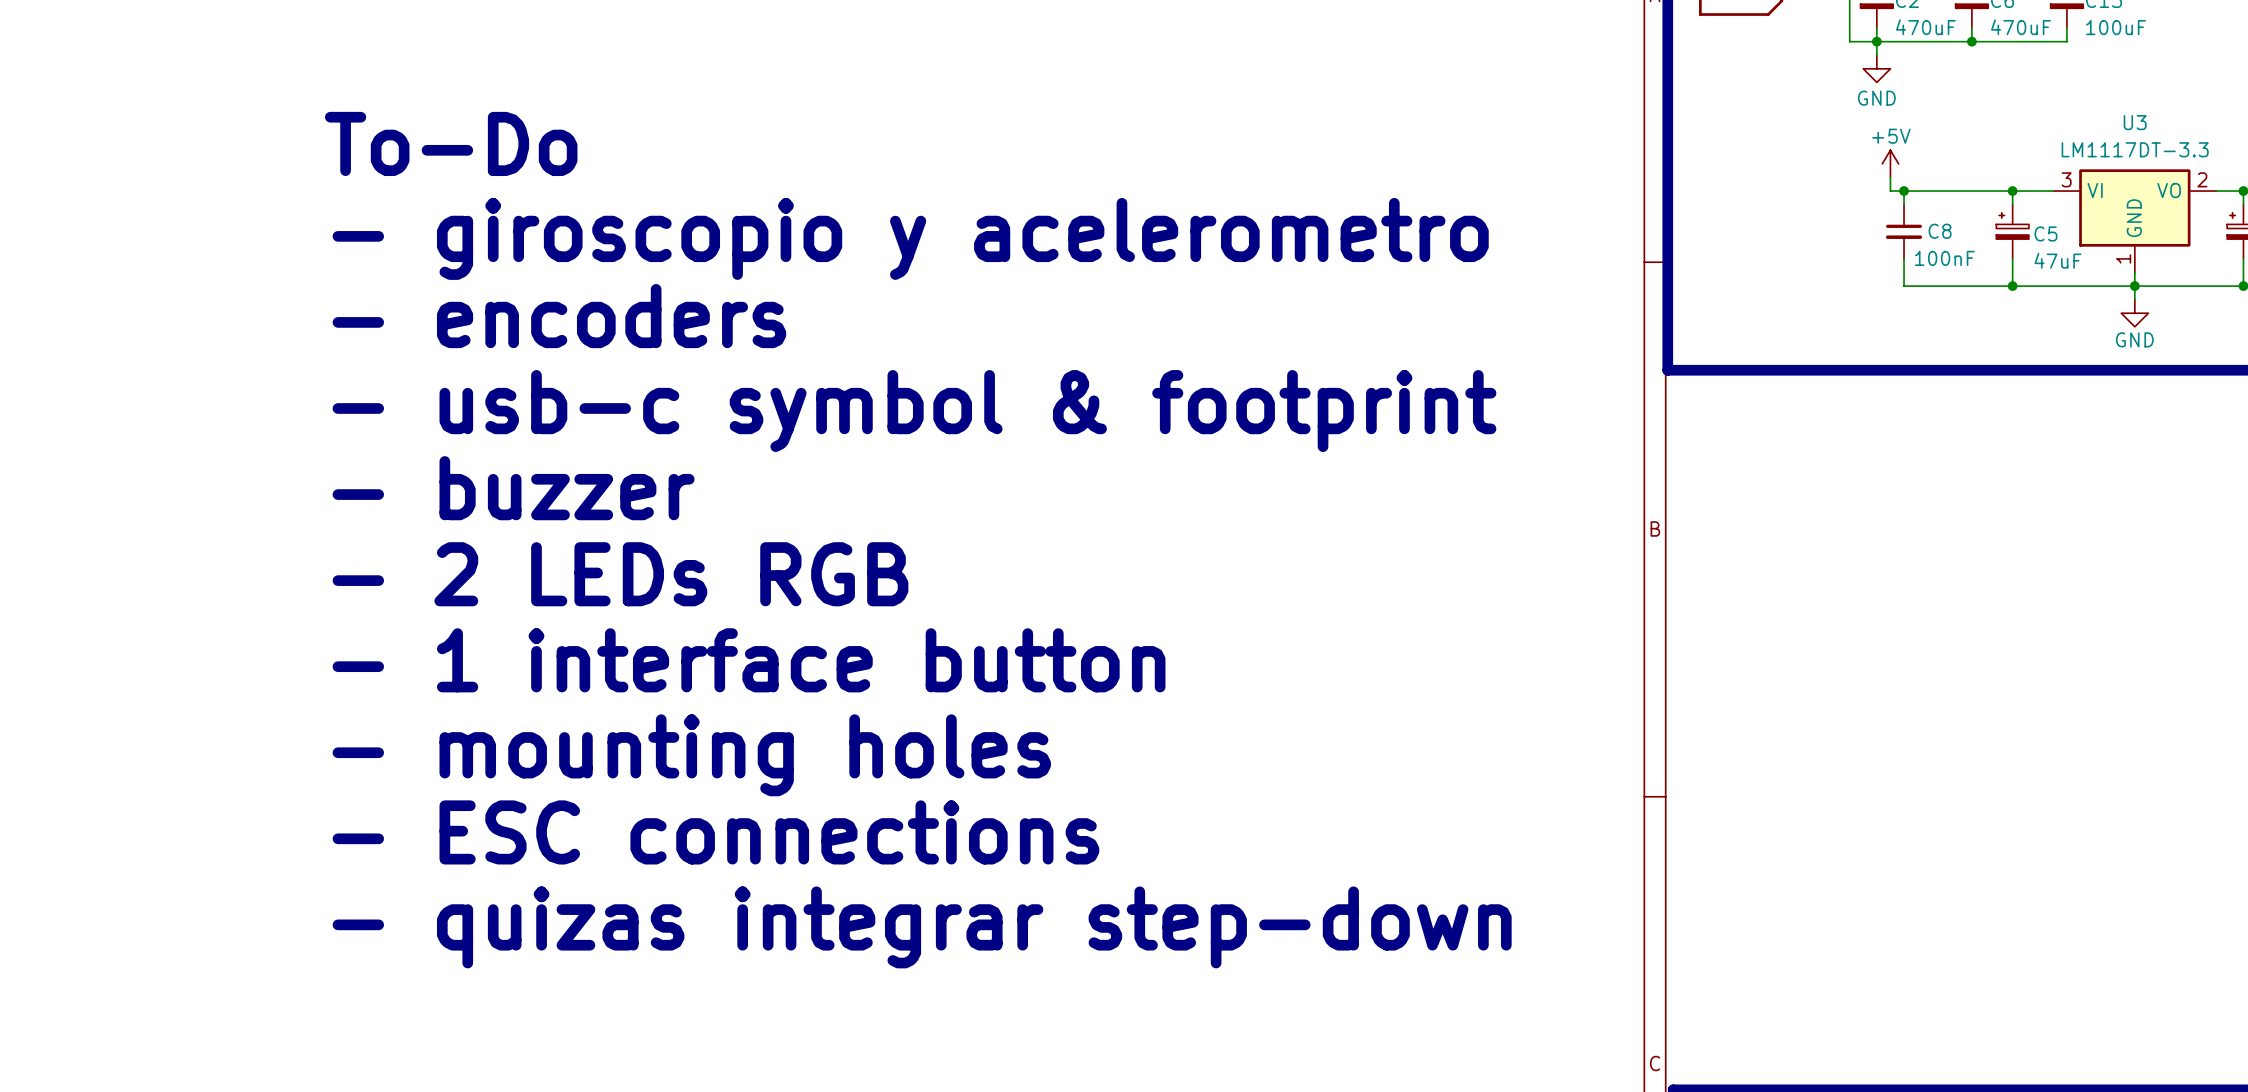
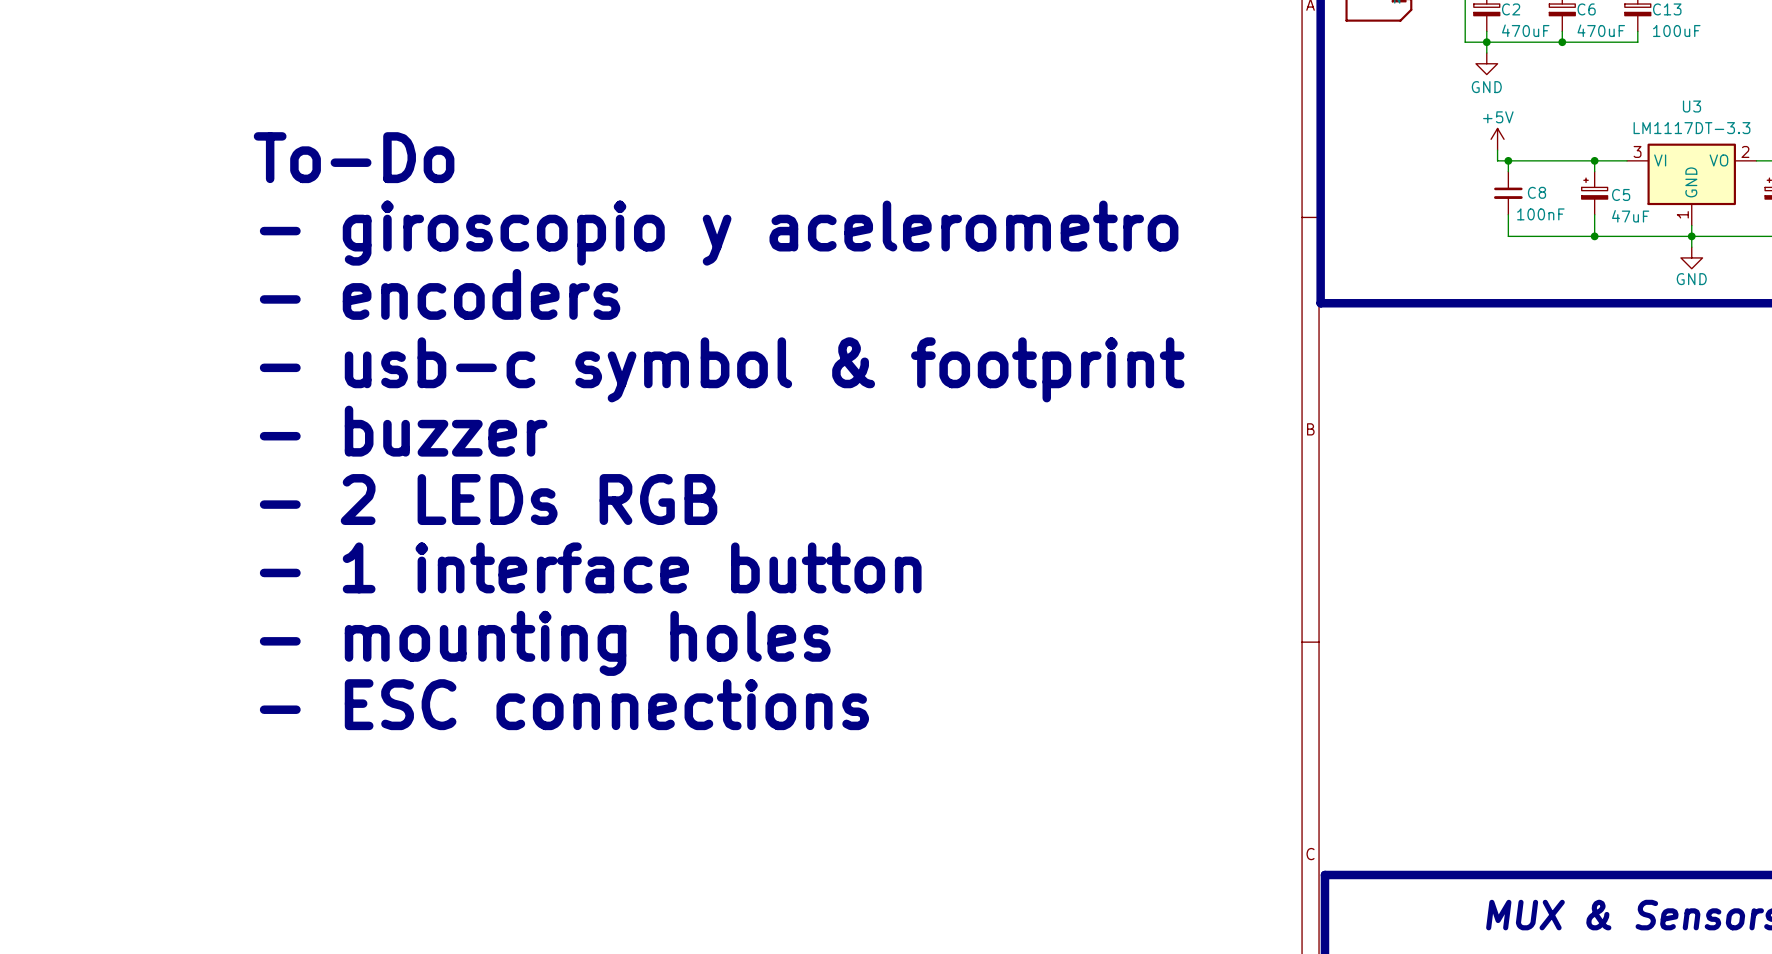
text position: To-Do (451, 143) -> To-Do (354, 157)
text position: - giroscopio y acelerometro (910, 238) -> - giroscopio y acelerometro (719, 233)
text position: - encoders (559, 316) -> - encoders (440, 294)
text position: - usb-c symbol & footprint (914, 411) -> - usb-c symbol & footprint (722, 369)
text position: - buzzer (513, 488) -> - buzzer (403, 431)
text position: - 2 LEDs RGB (620, 574) -> - 2 LEDs RGB (488, 499)
text position: - 1 interface button (749, 660) -> - 1 interface button (590, 567)
text position: - mounting holes (691, 755) -> - mounting holes (545, 643)
text position: - ESC connections (715, 832) -> - ESC connections (564, 704)
text: - quizas integrar step-down (922, 927) -> none

